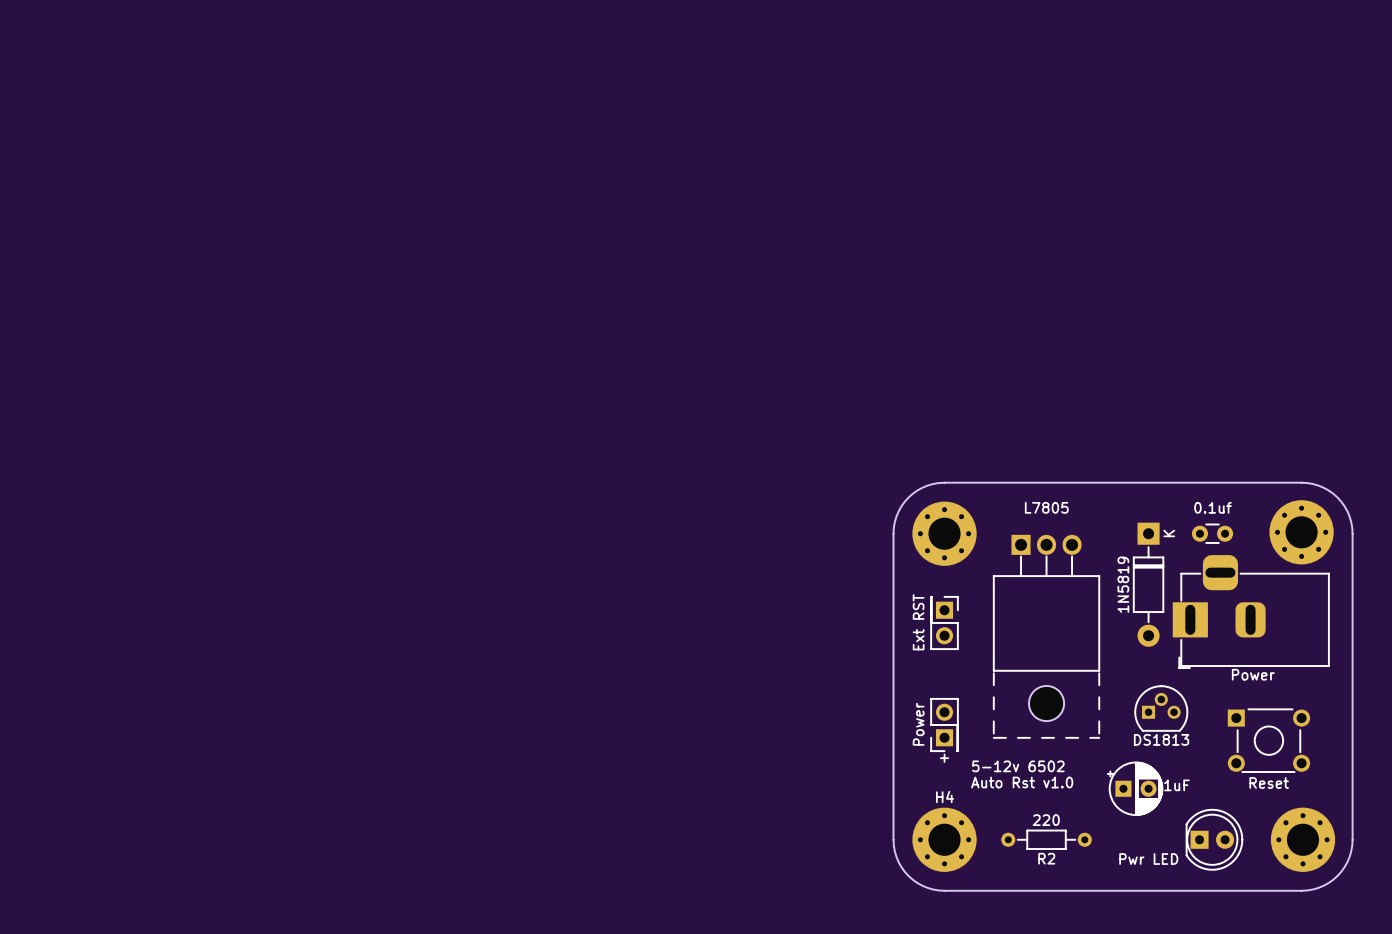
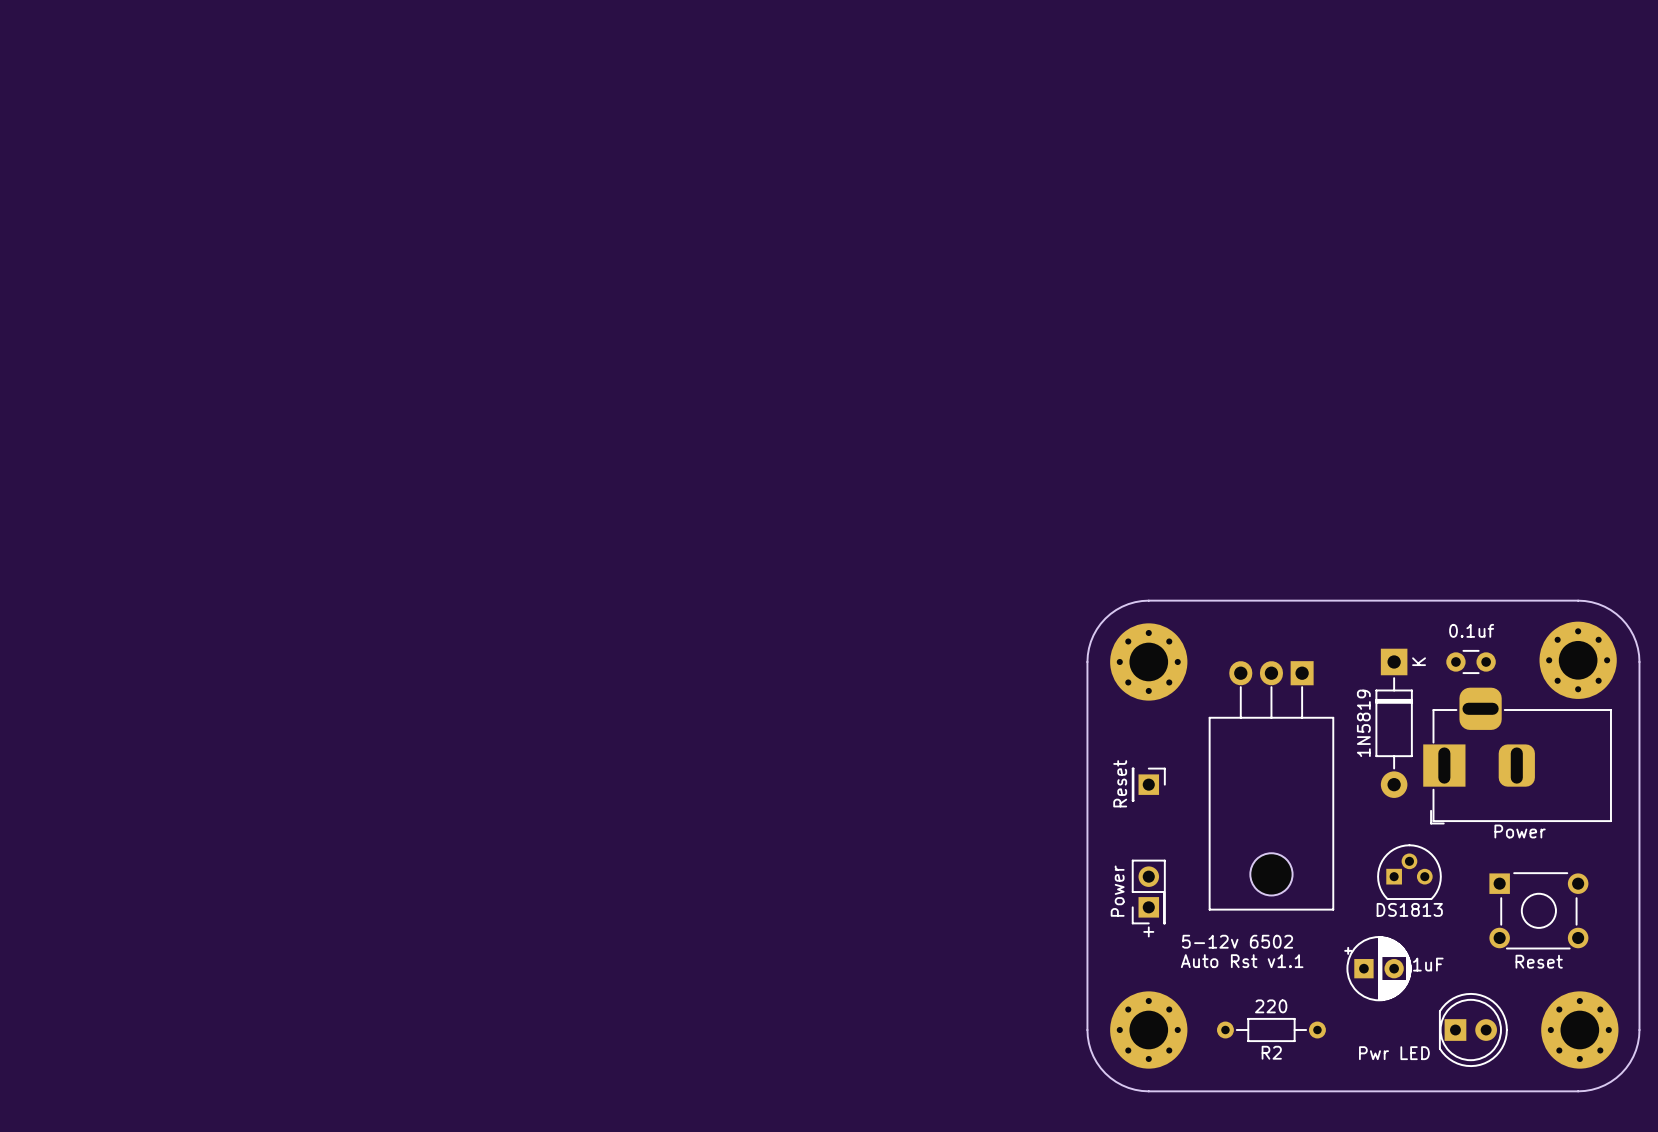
part value: L7805 (1046, 507) -> none
part footprint: [993, 534, 1100, 739] -> [1208, 661, 1335, 911]
part: Ext RST (944, 622) -> none
part: none -> Reset (1148, 784)
text: Auto Rst v1.0 (1022, 782) -> Auto Rst v1.1 (1242, 961)
H4 name: H4 (944, 796) -> none

